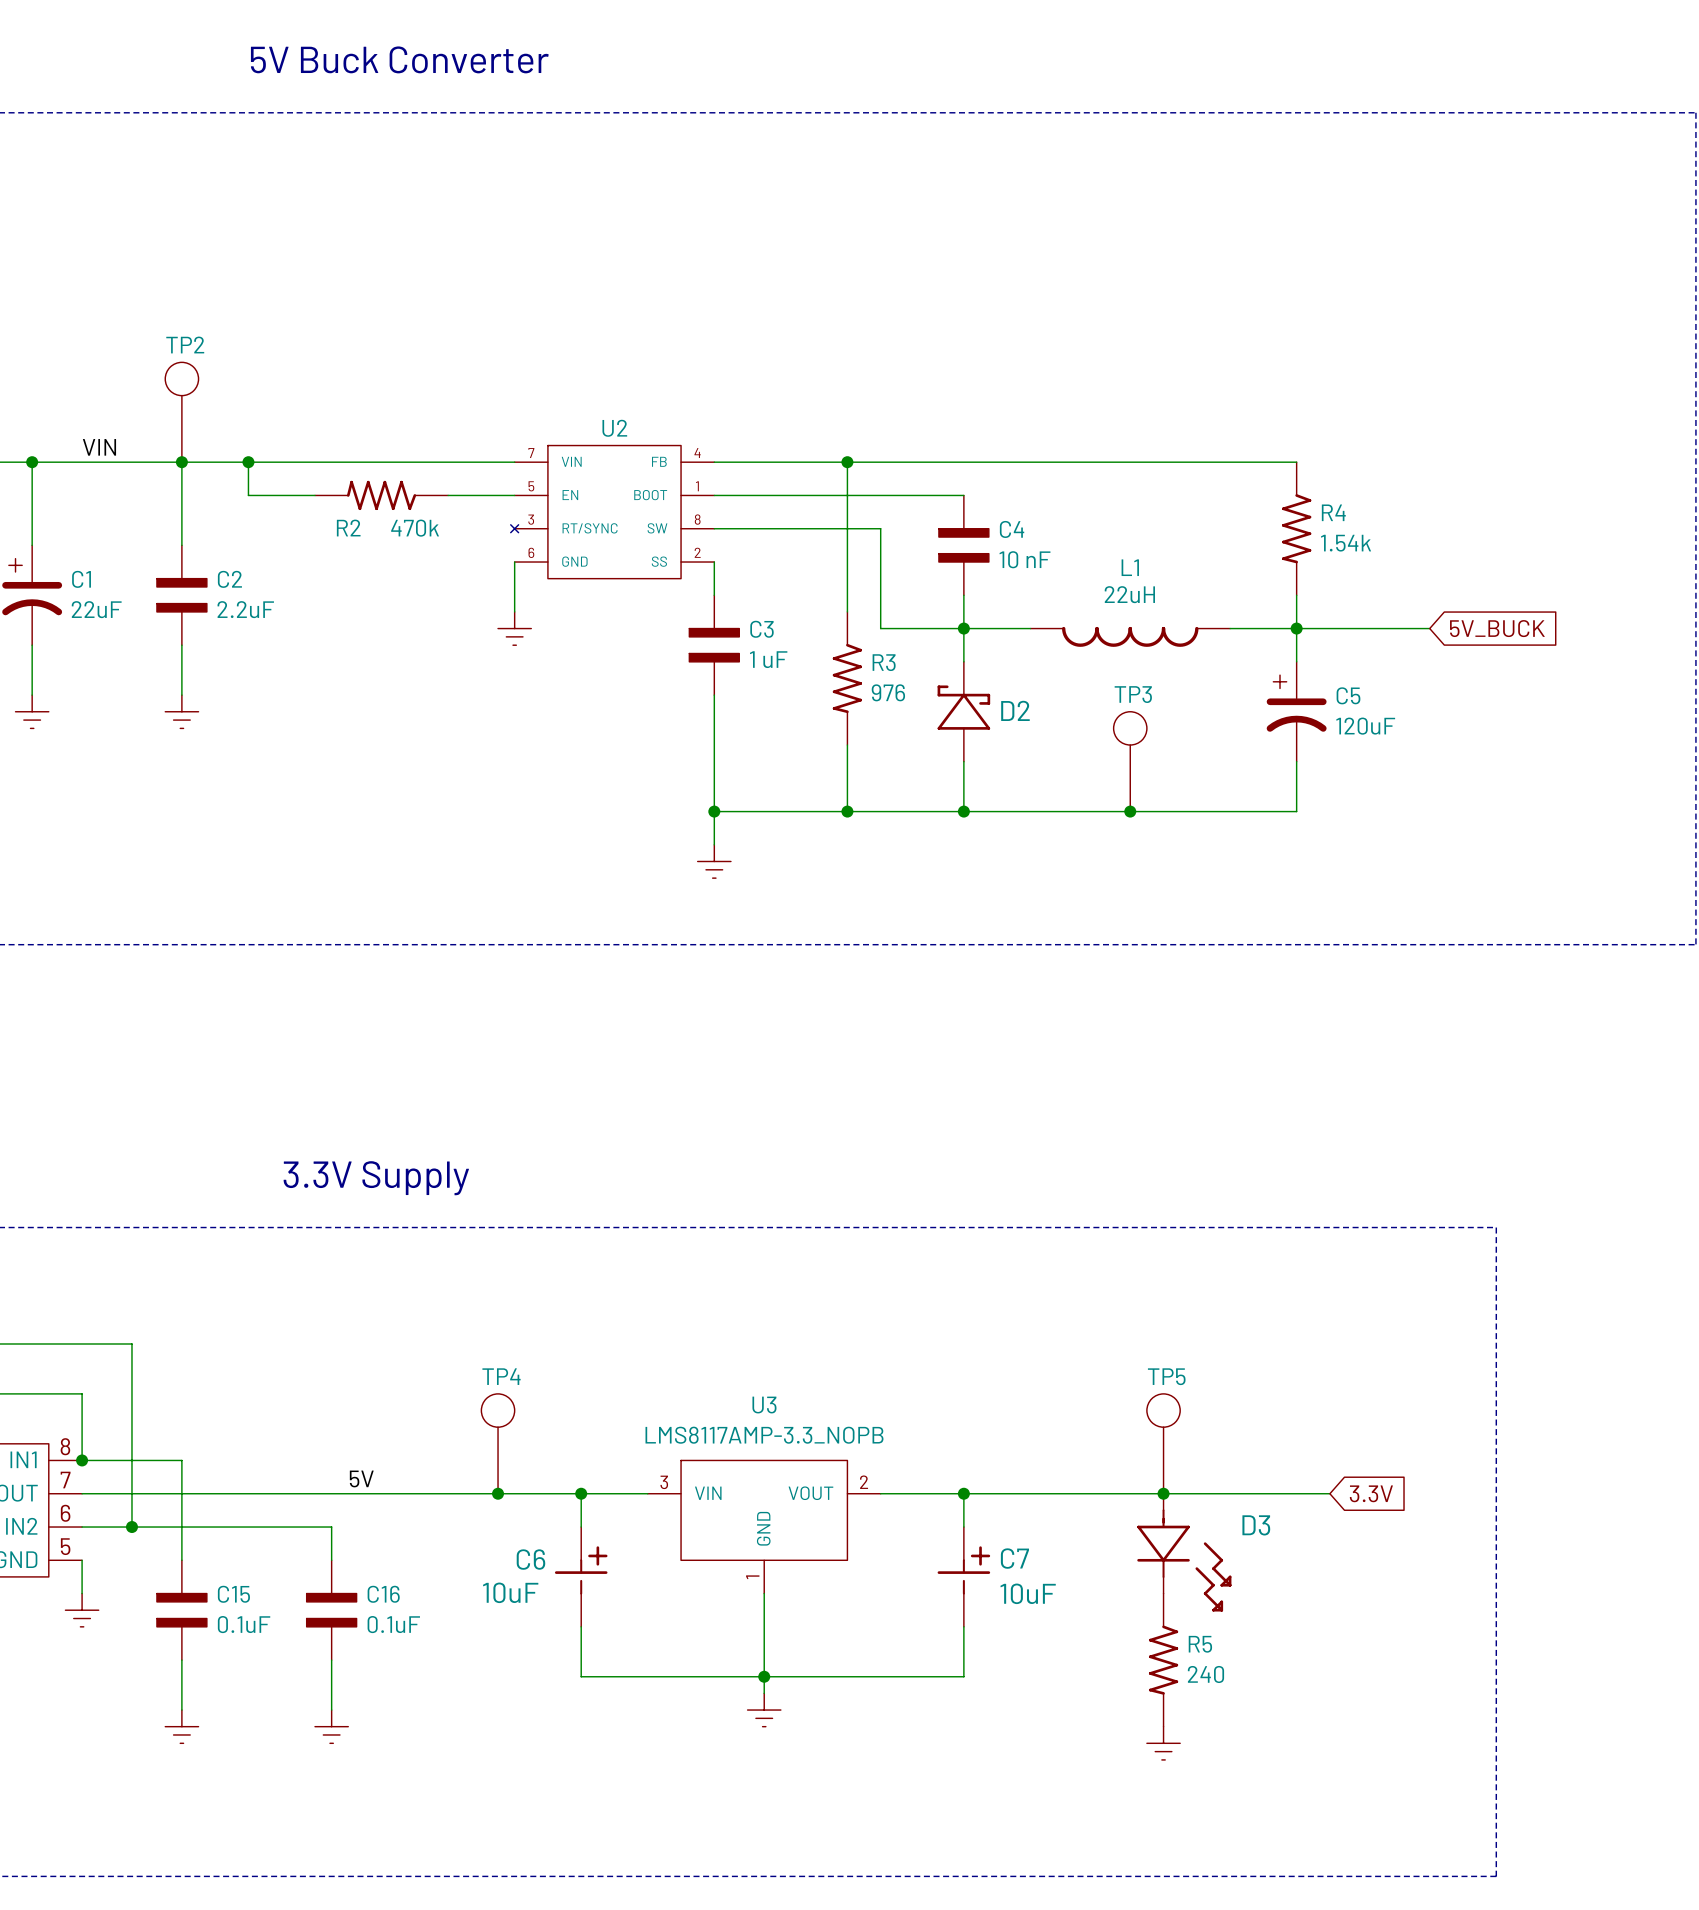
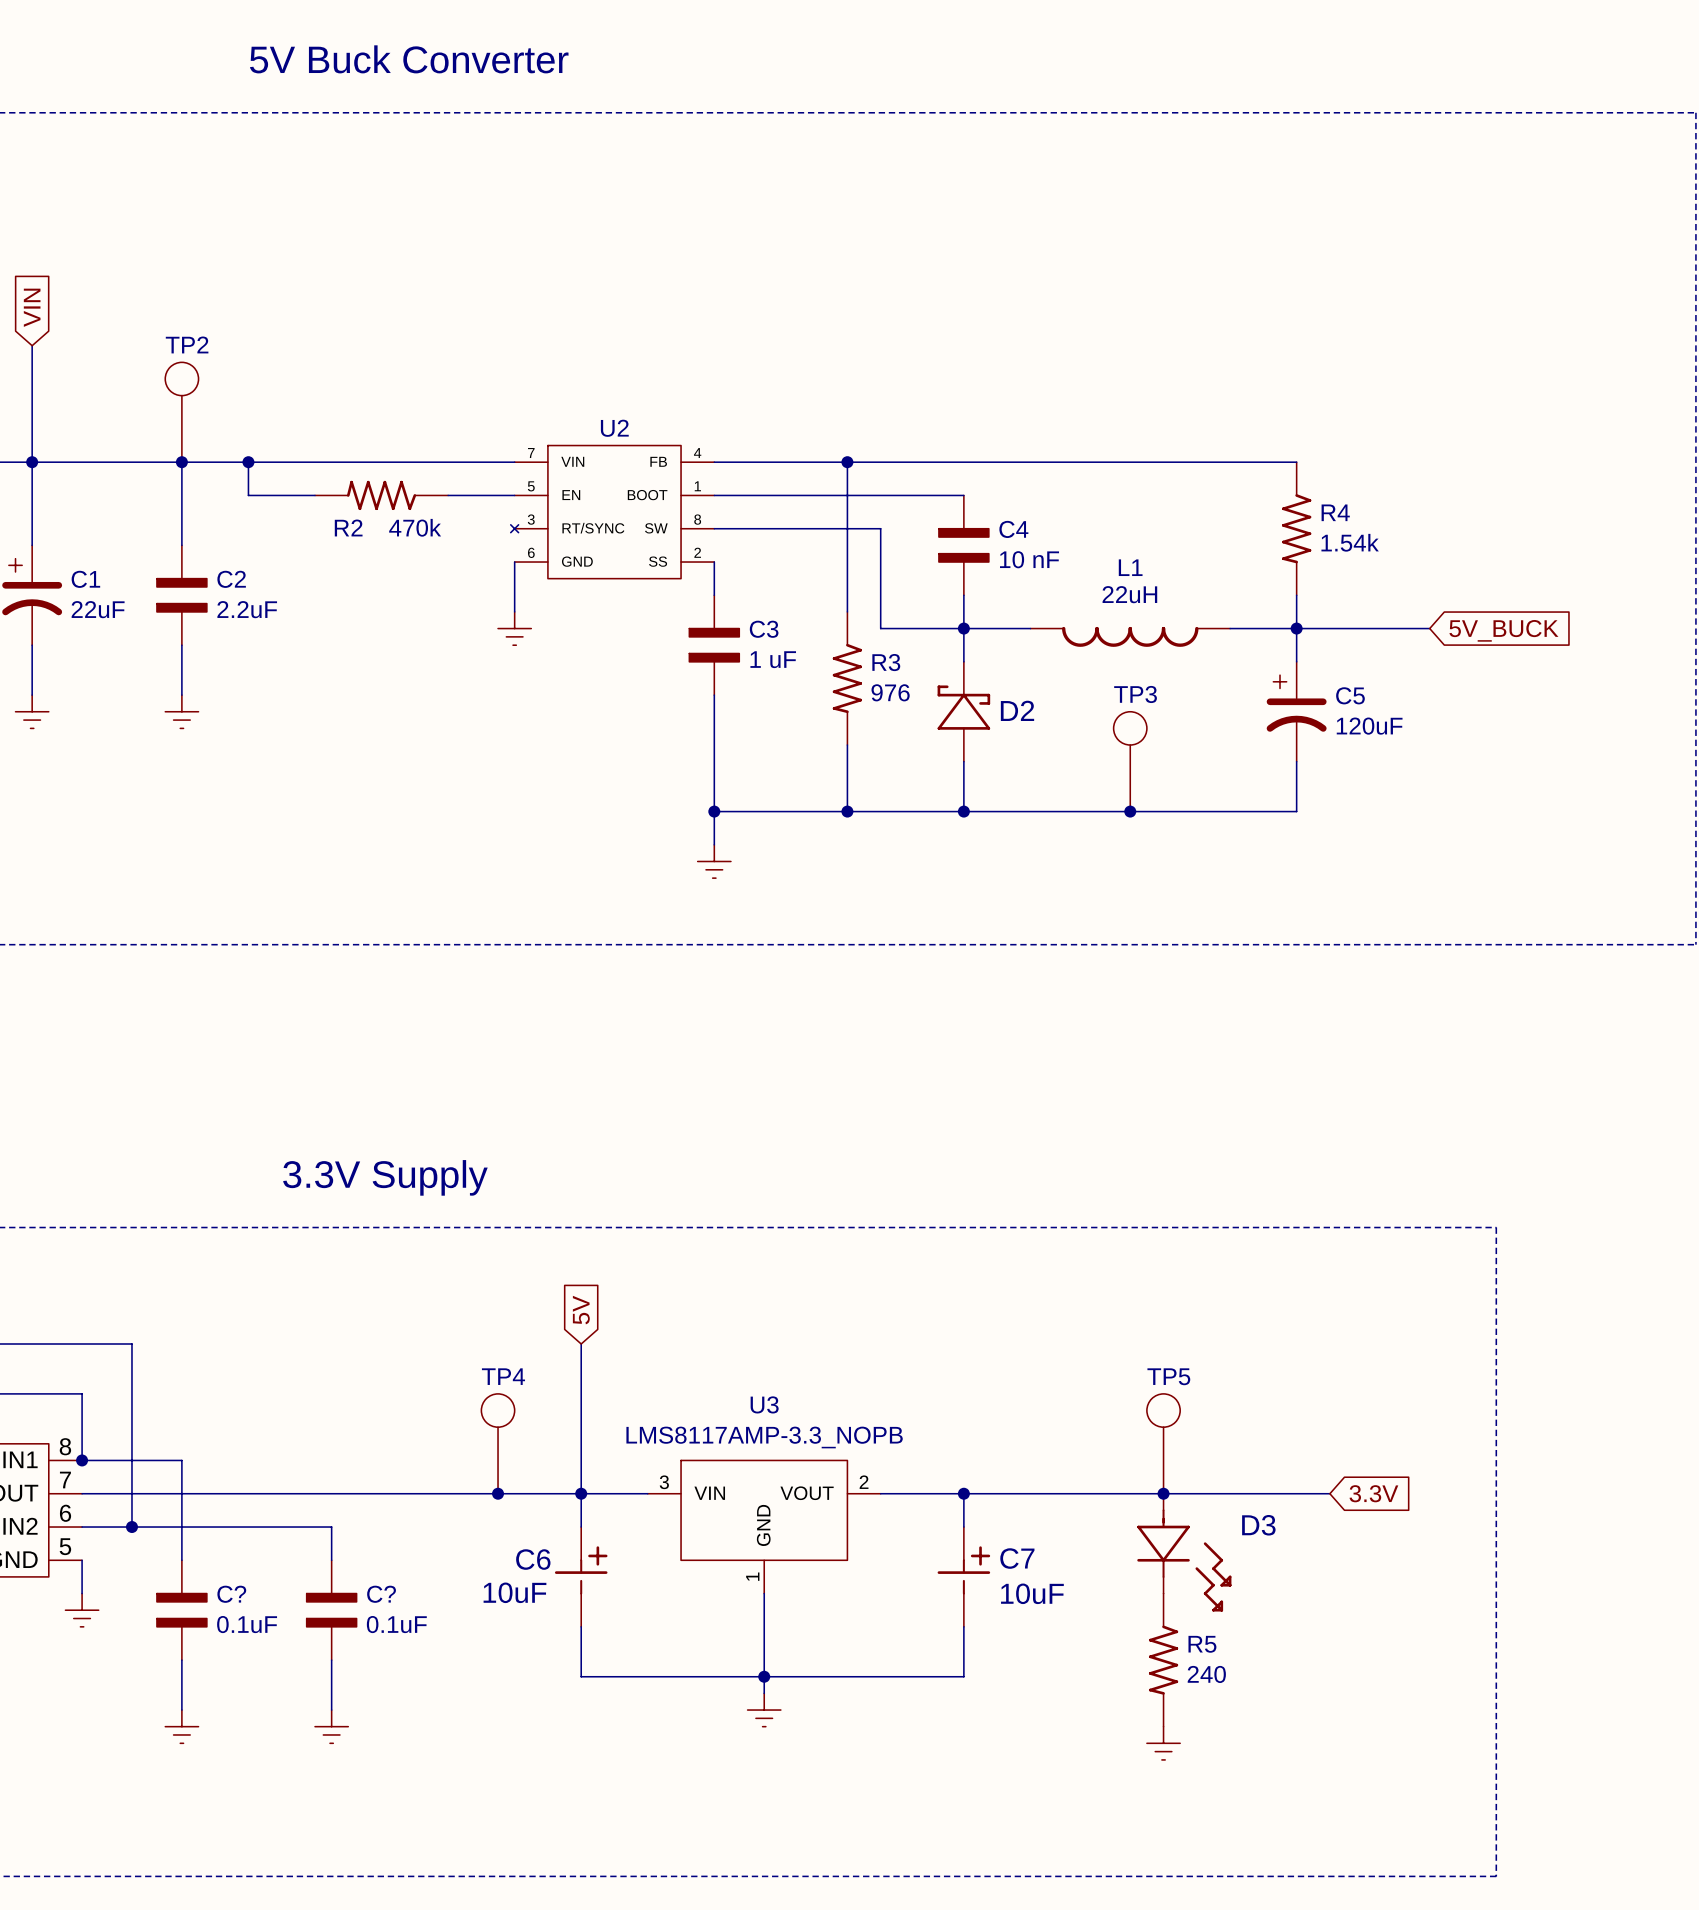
global label: none -> VIN (32, 307)
wire: none -> (32, 345) (32, 462)
label: VIN (99, 447) -> none
global label: none -> 5V (581, 1310)
wire: none -> (581, 1343) (581, 1493)
label: 5V (361, 1478) -> none
C15 name: C15 (233, 1594) -> C? (231, 1594)
C16 name: C16 (383, 1594) -> C? (381, 1594)

